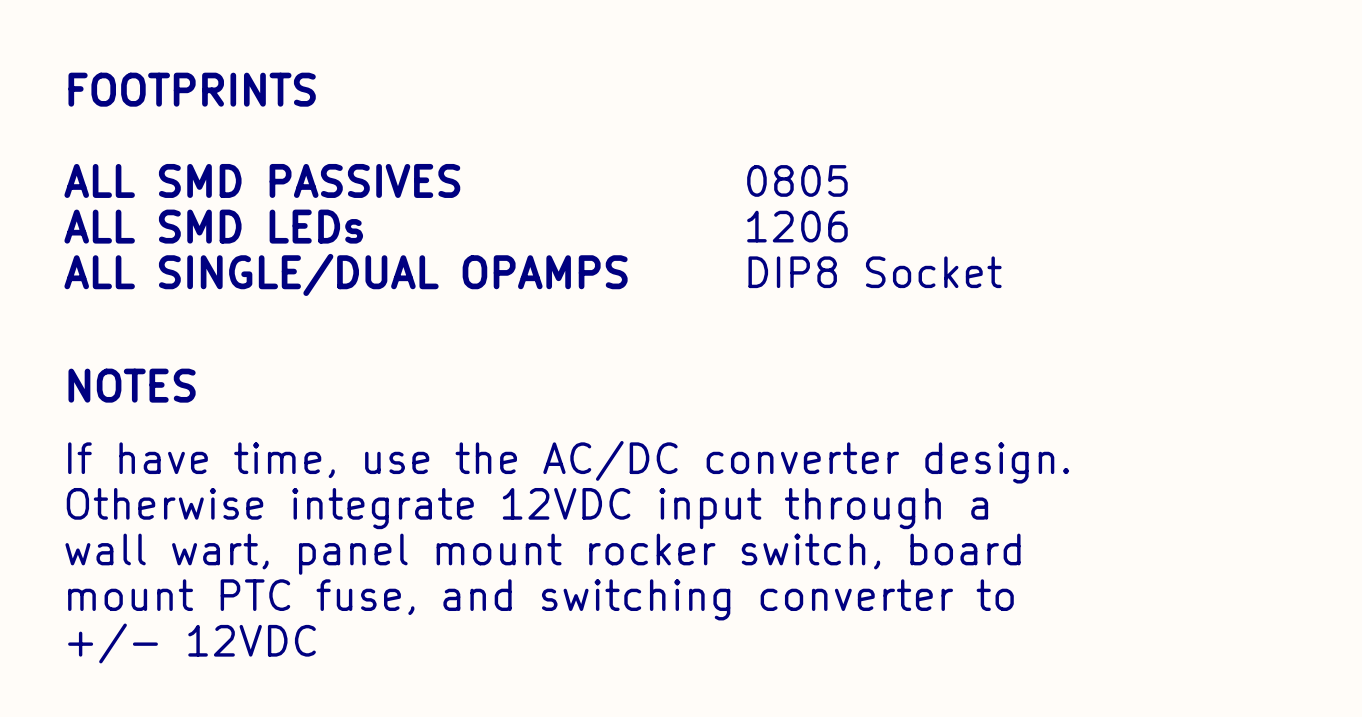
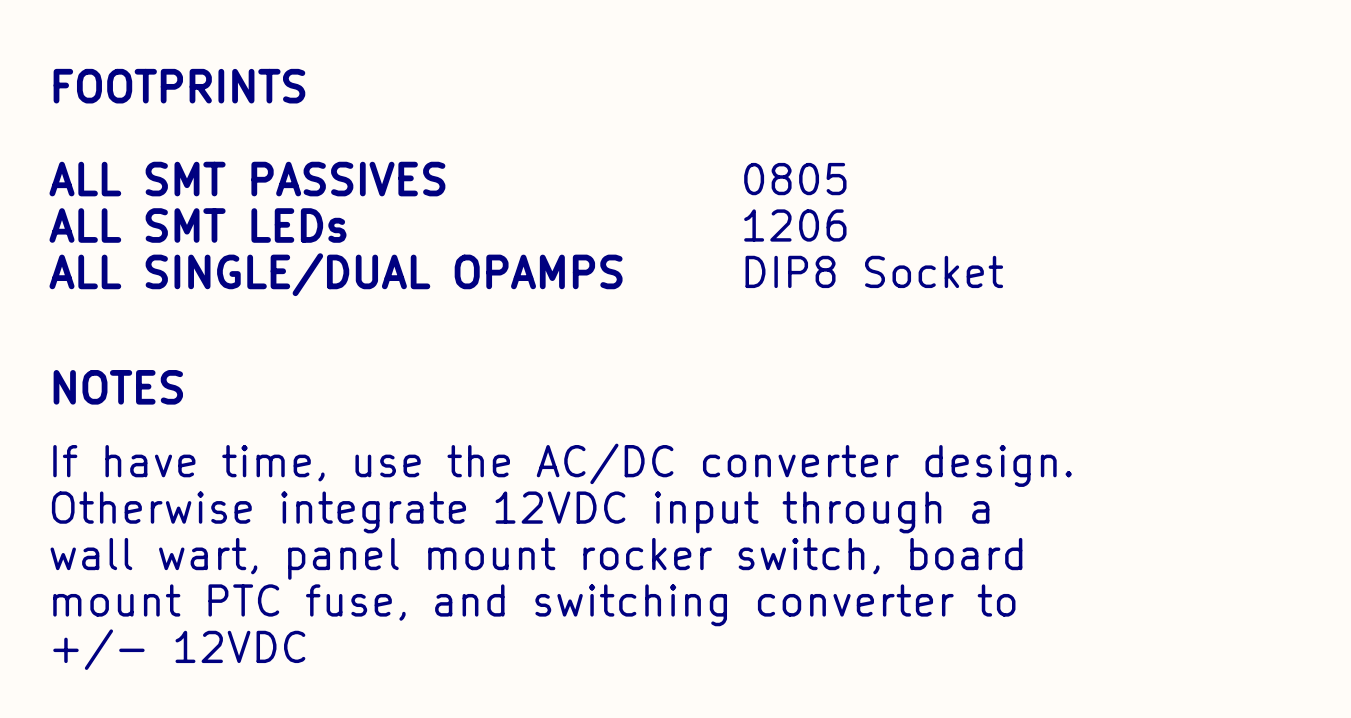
text: ALL SMD PASSIVES (262, 180) -> ALL SMT PASSIVES (247, 179)
text: ALL SMD LEDs (213, 226) -> ALL SMT LEDs (197, 225)

